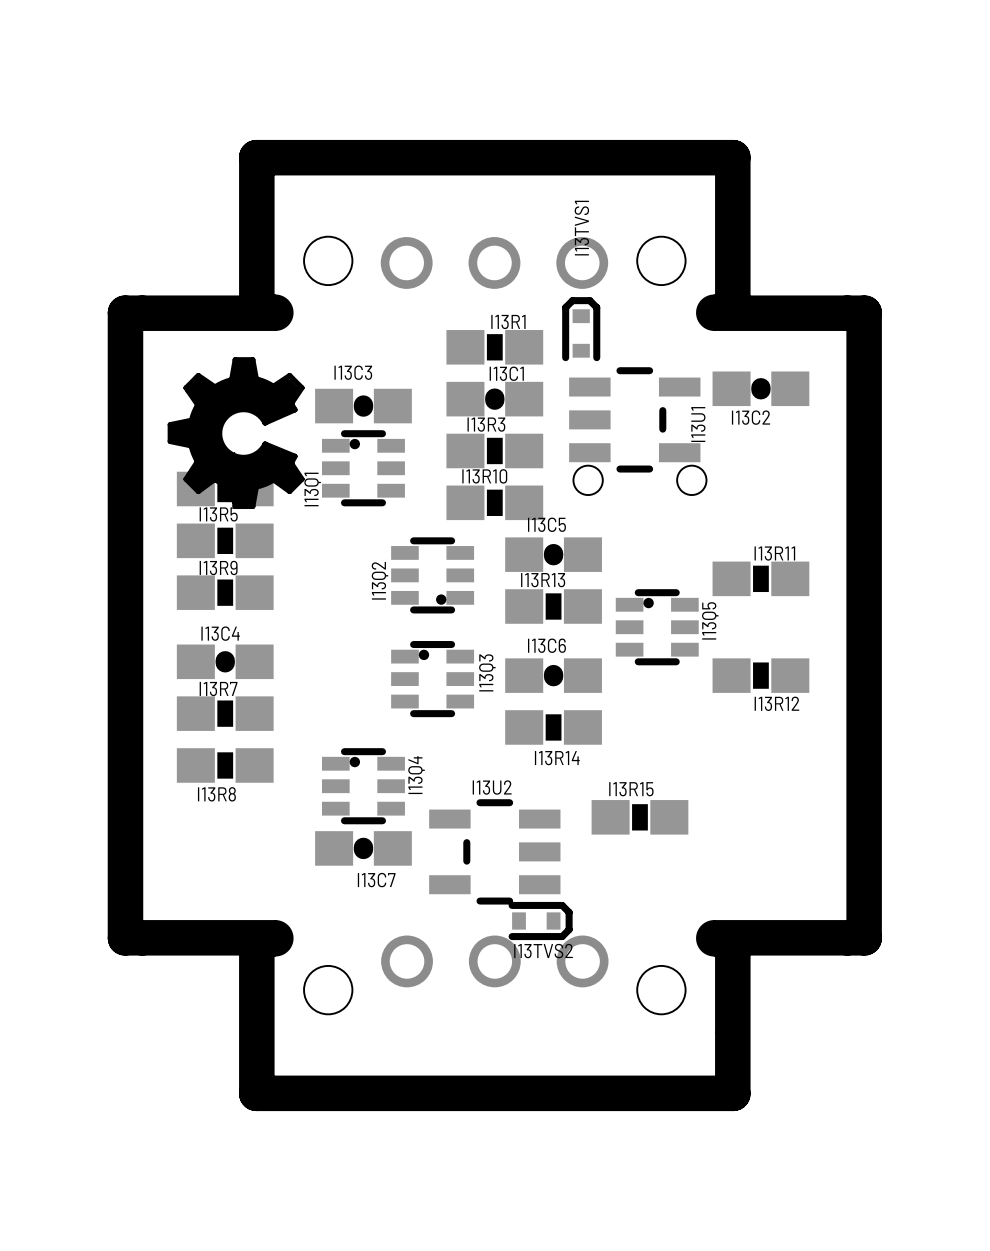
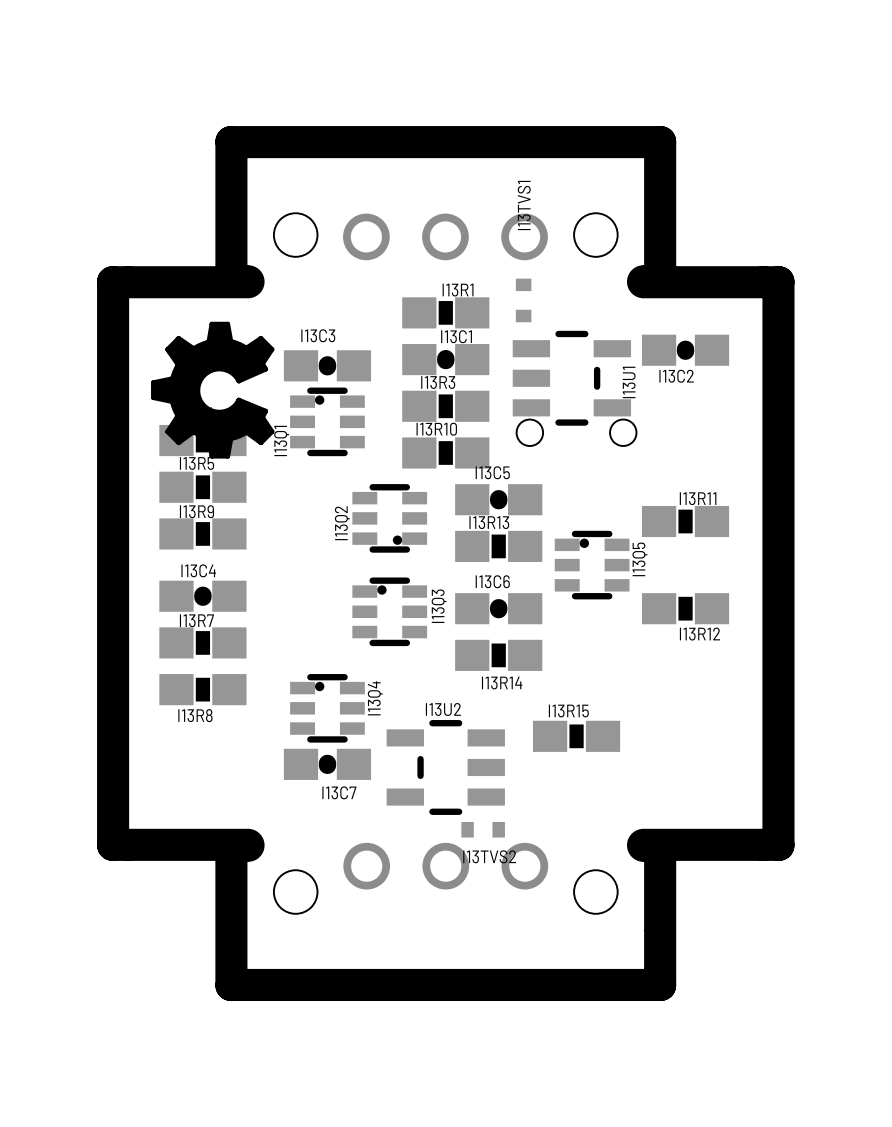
I13TVS1 footprint: [562, 297, 601, 362] -> [515, 278, 532, 323]
I13TVS2 footprint: [508, 901, 573, 941] -> [461, 821, 505, 838]

